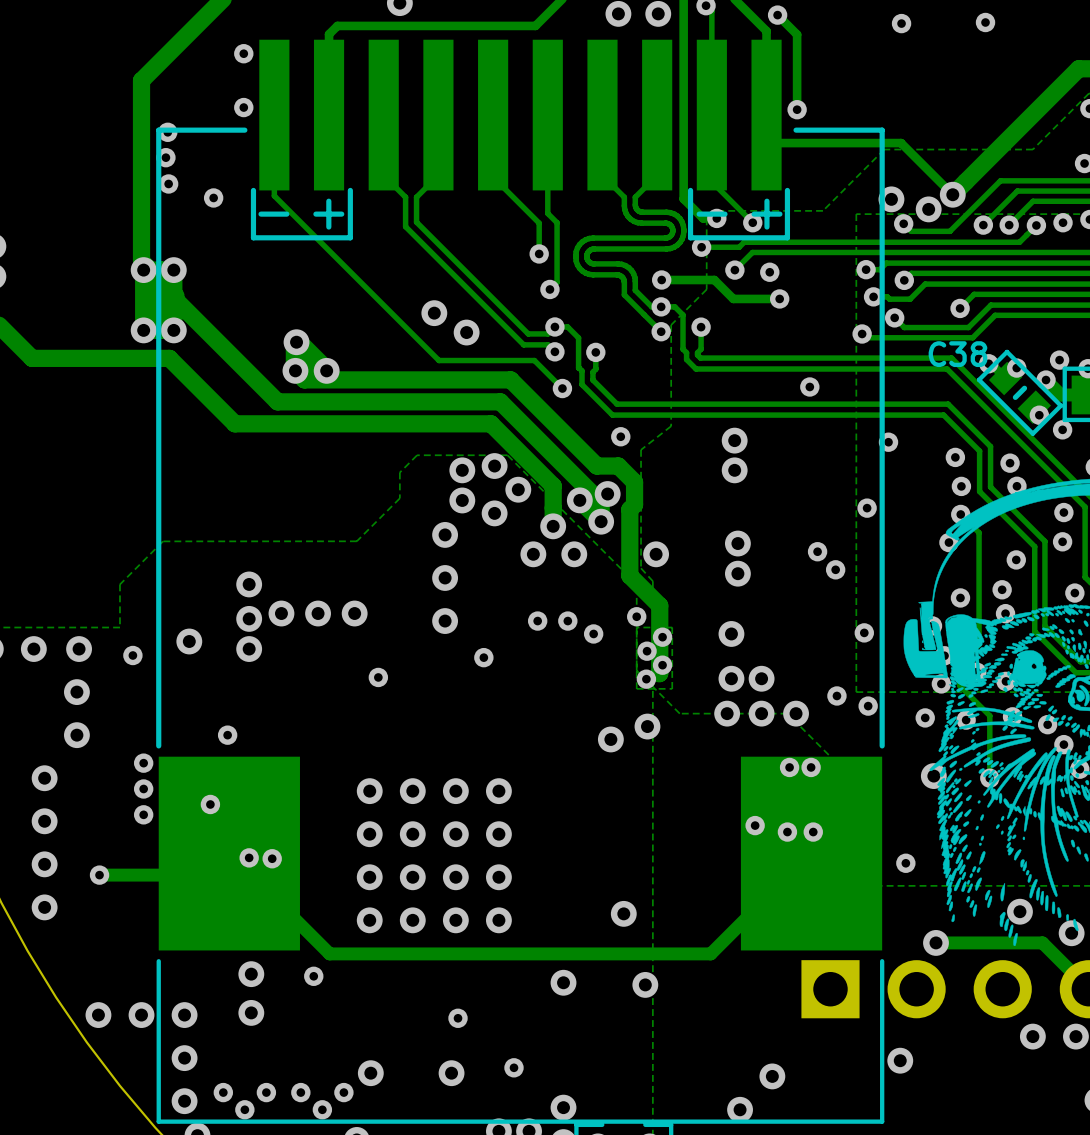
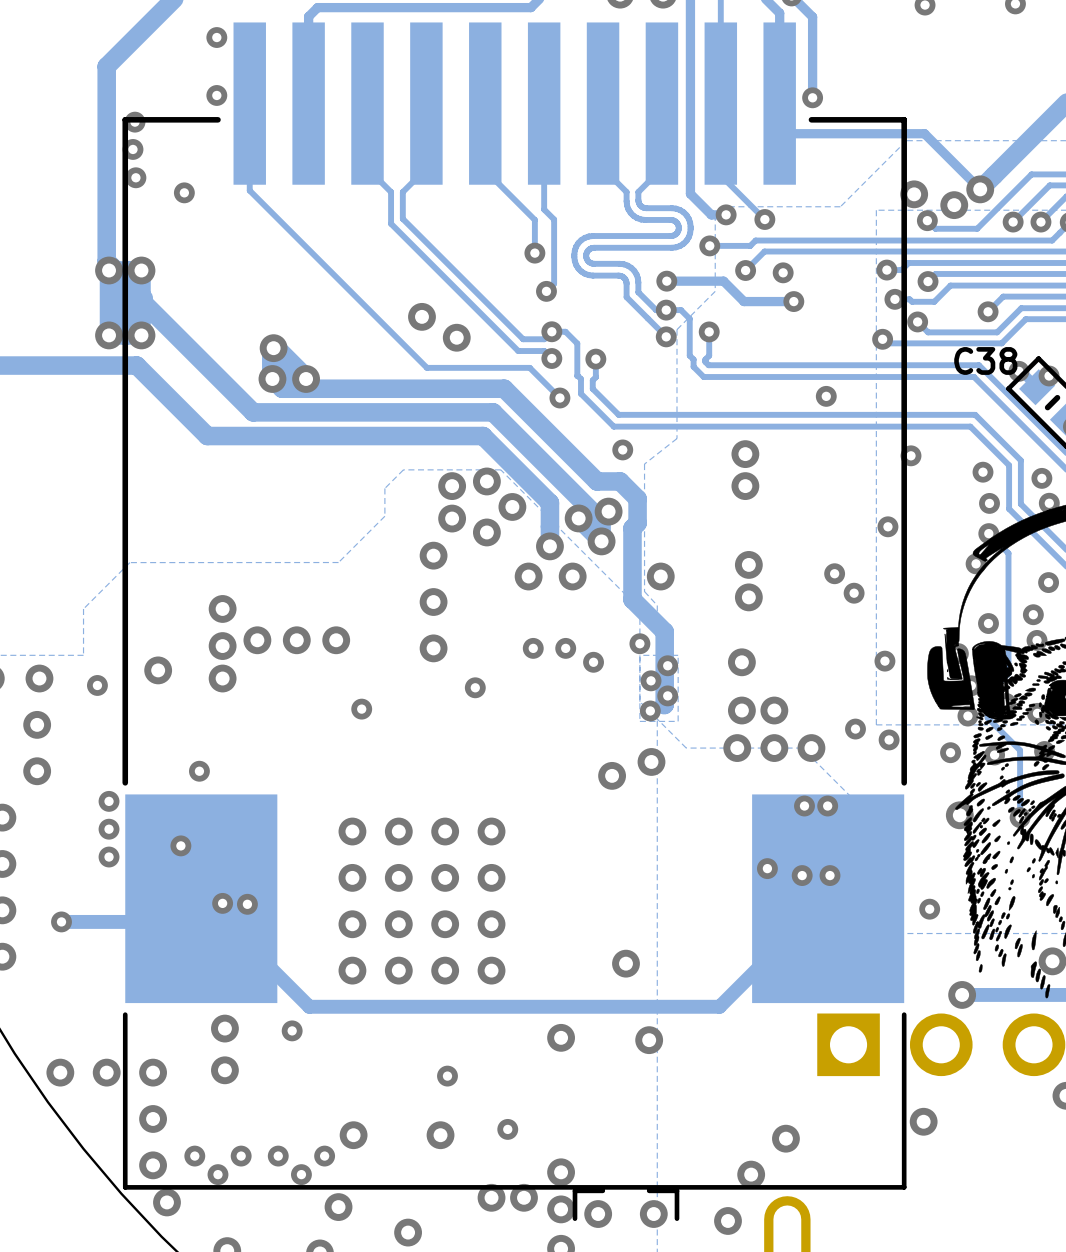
part footprint: [156, 39, 885, 951] -> [122, 22, 907, 1004]

